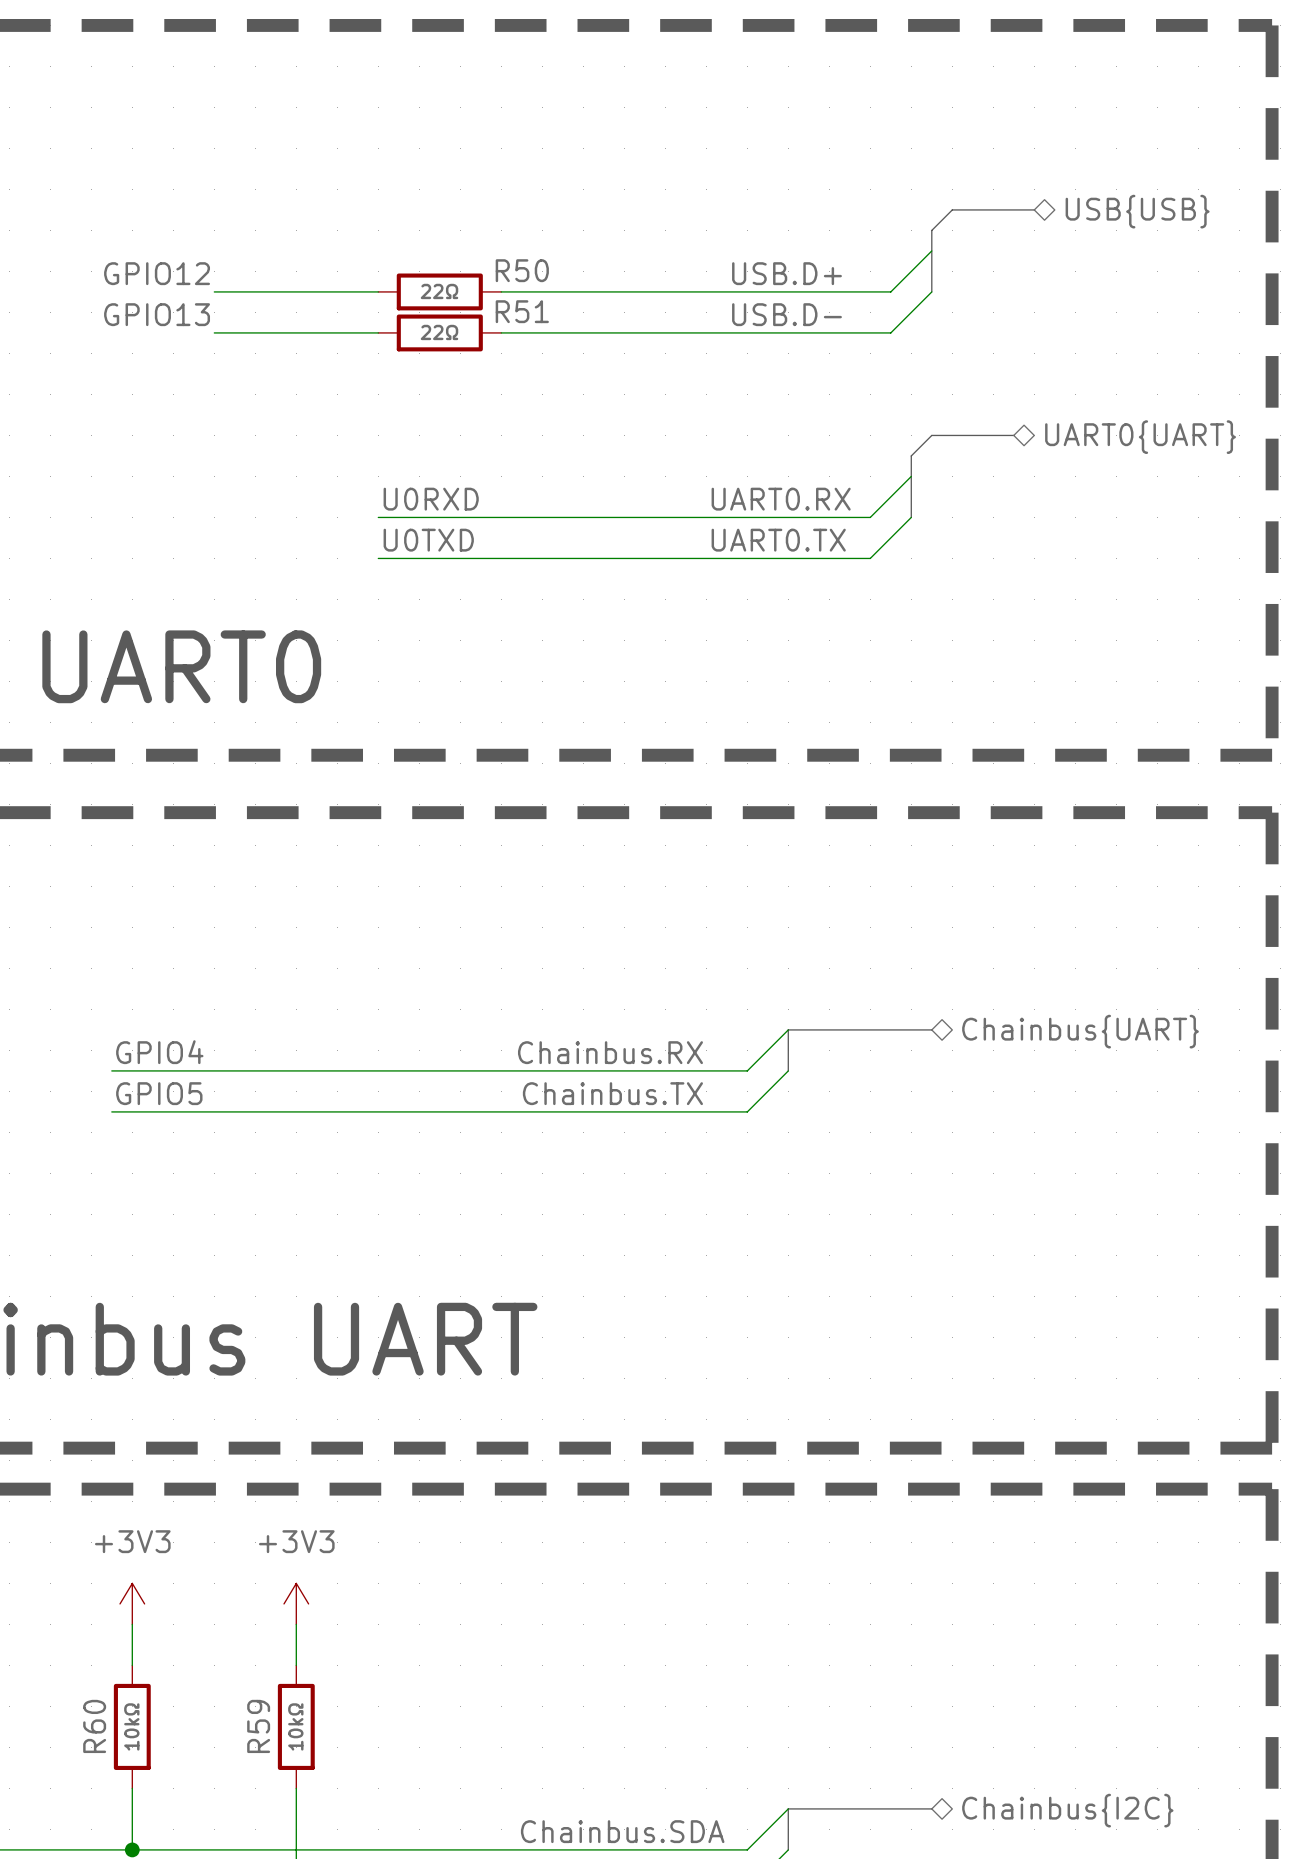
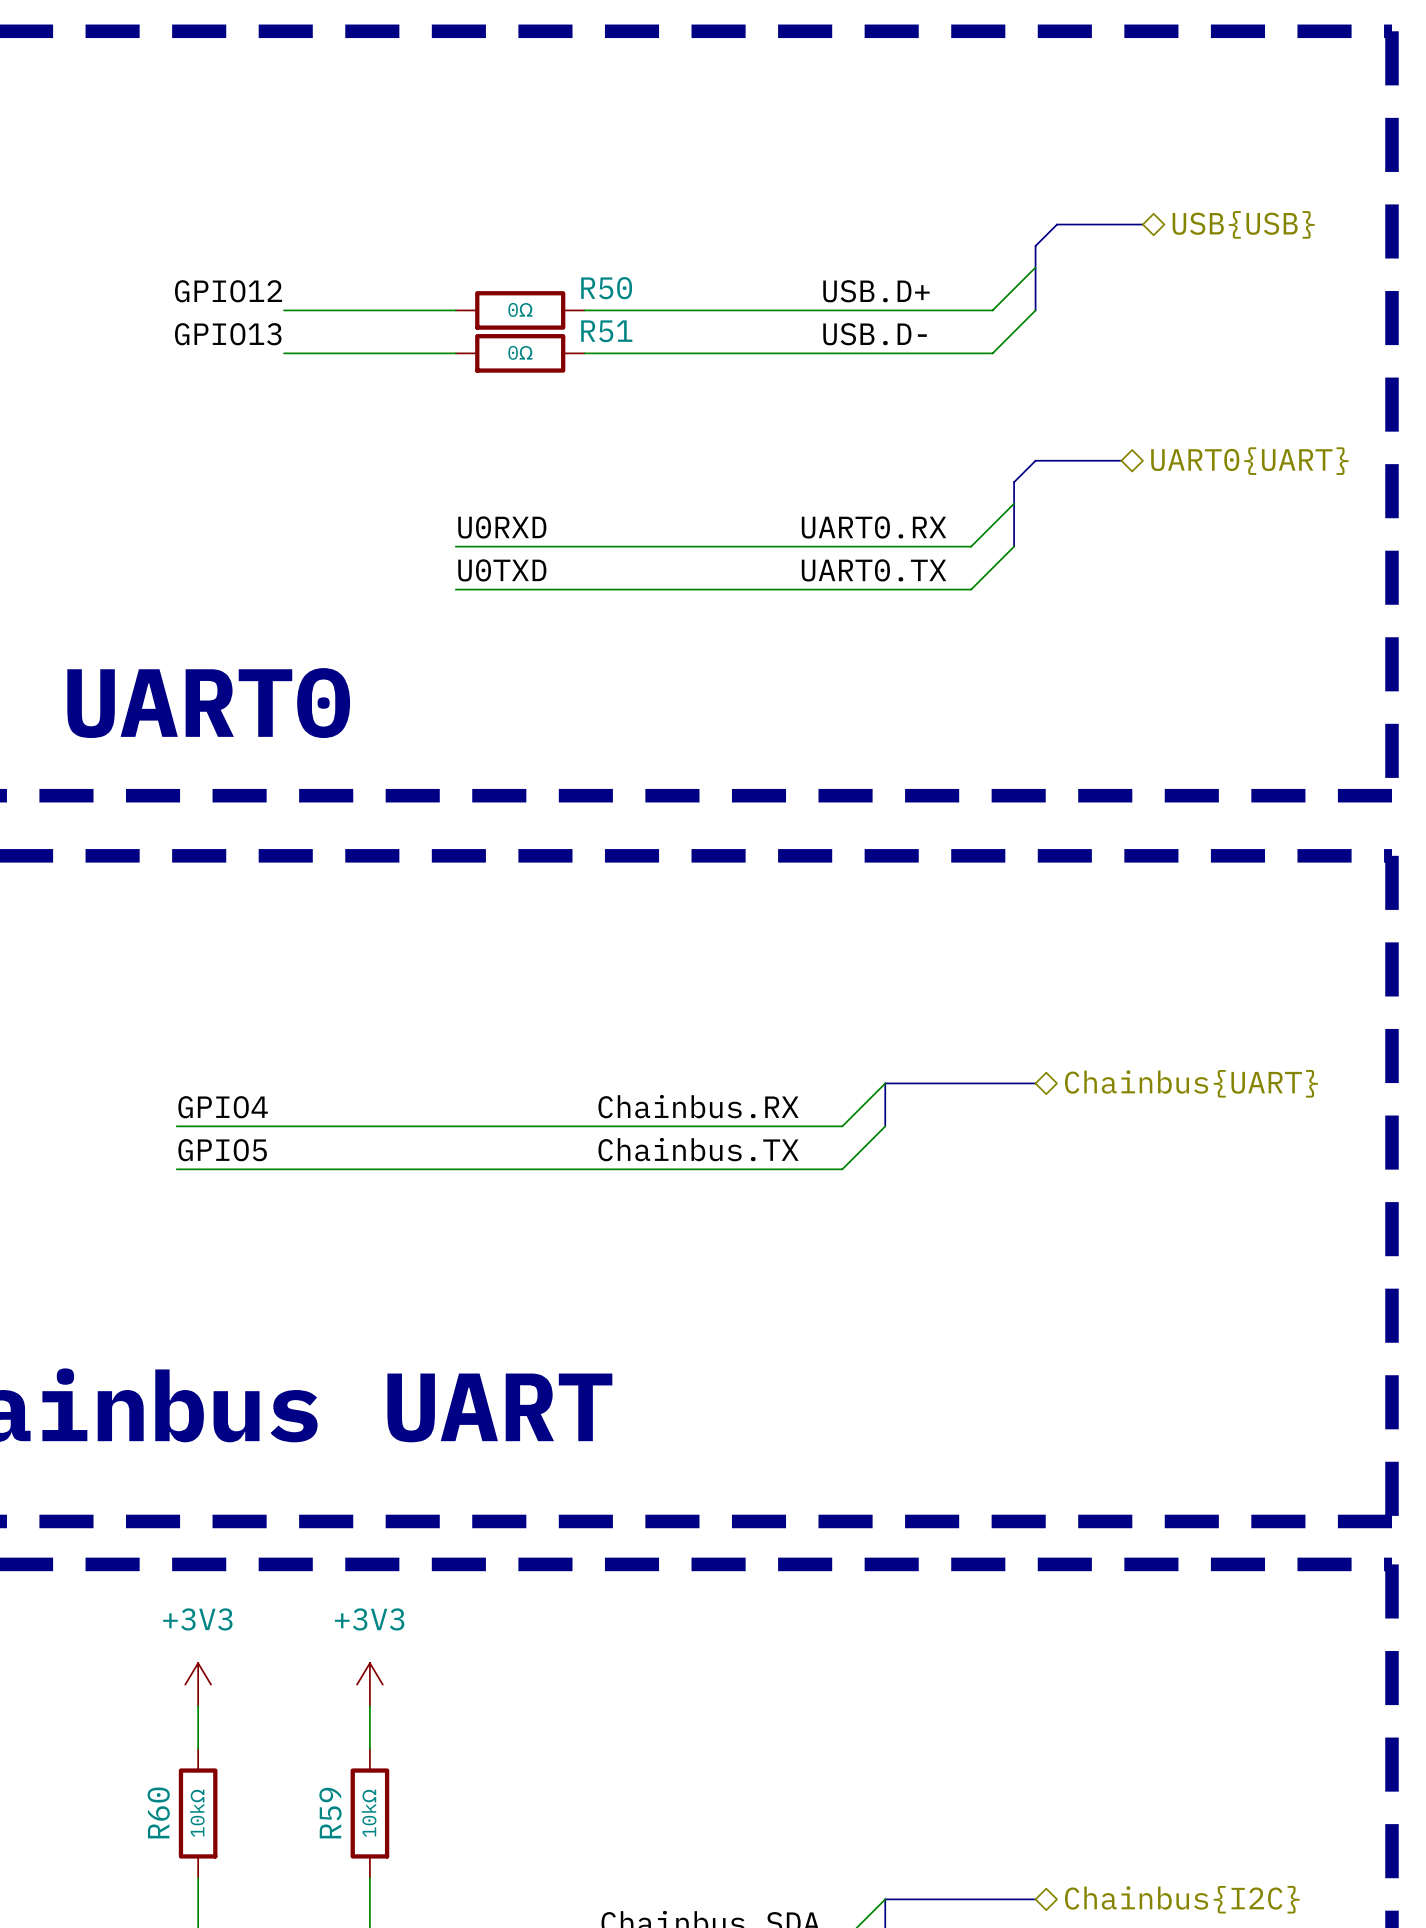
R50 value: 22Ω (439, 291) -> 0Ω (520, 309)
R51 value: 22Ω (439, 332) -> 0Ω (520, 352)

